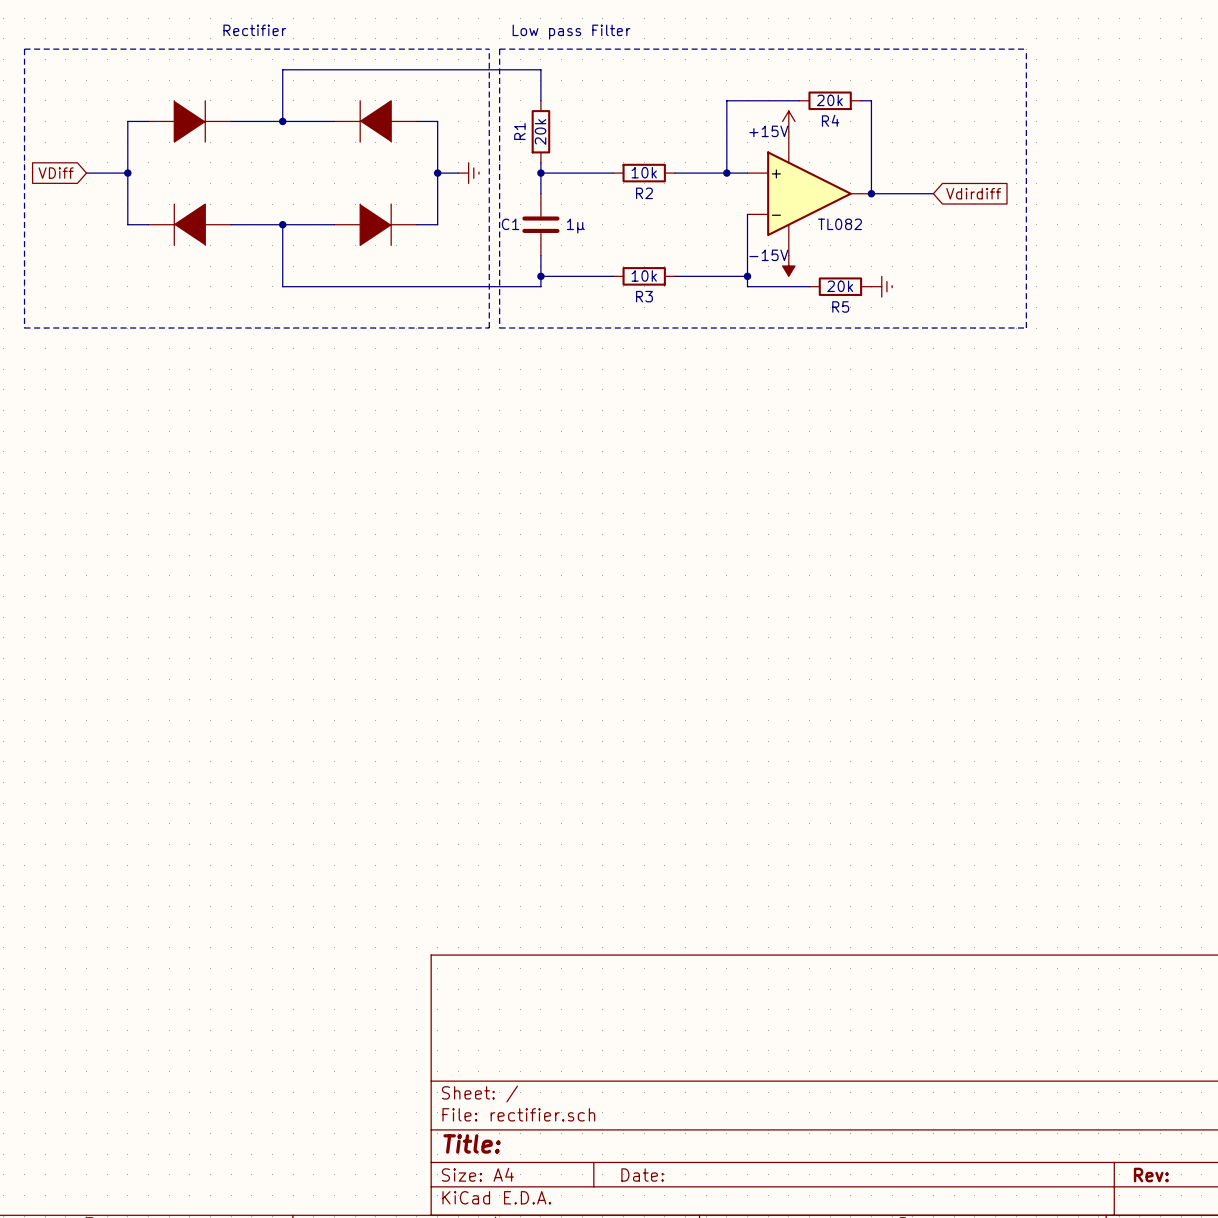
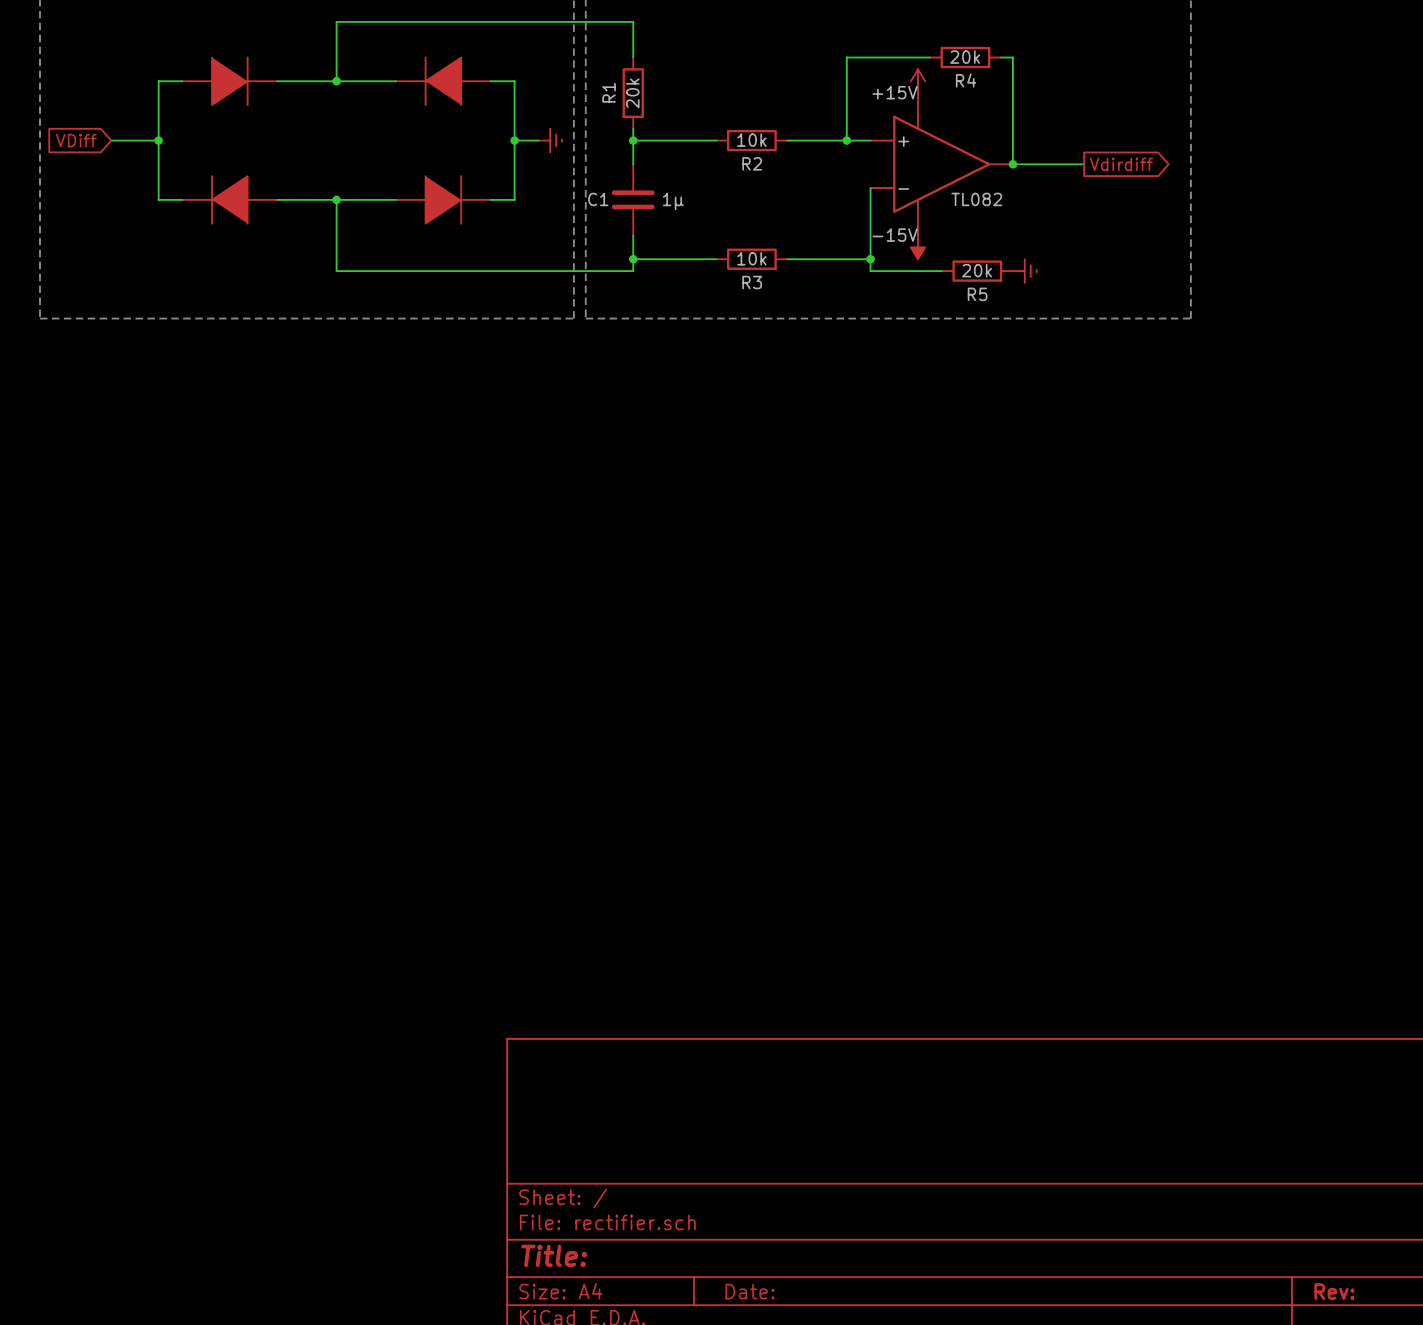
global label shape: input (973, 193) -> output (1121, 164)

